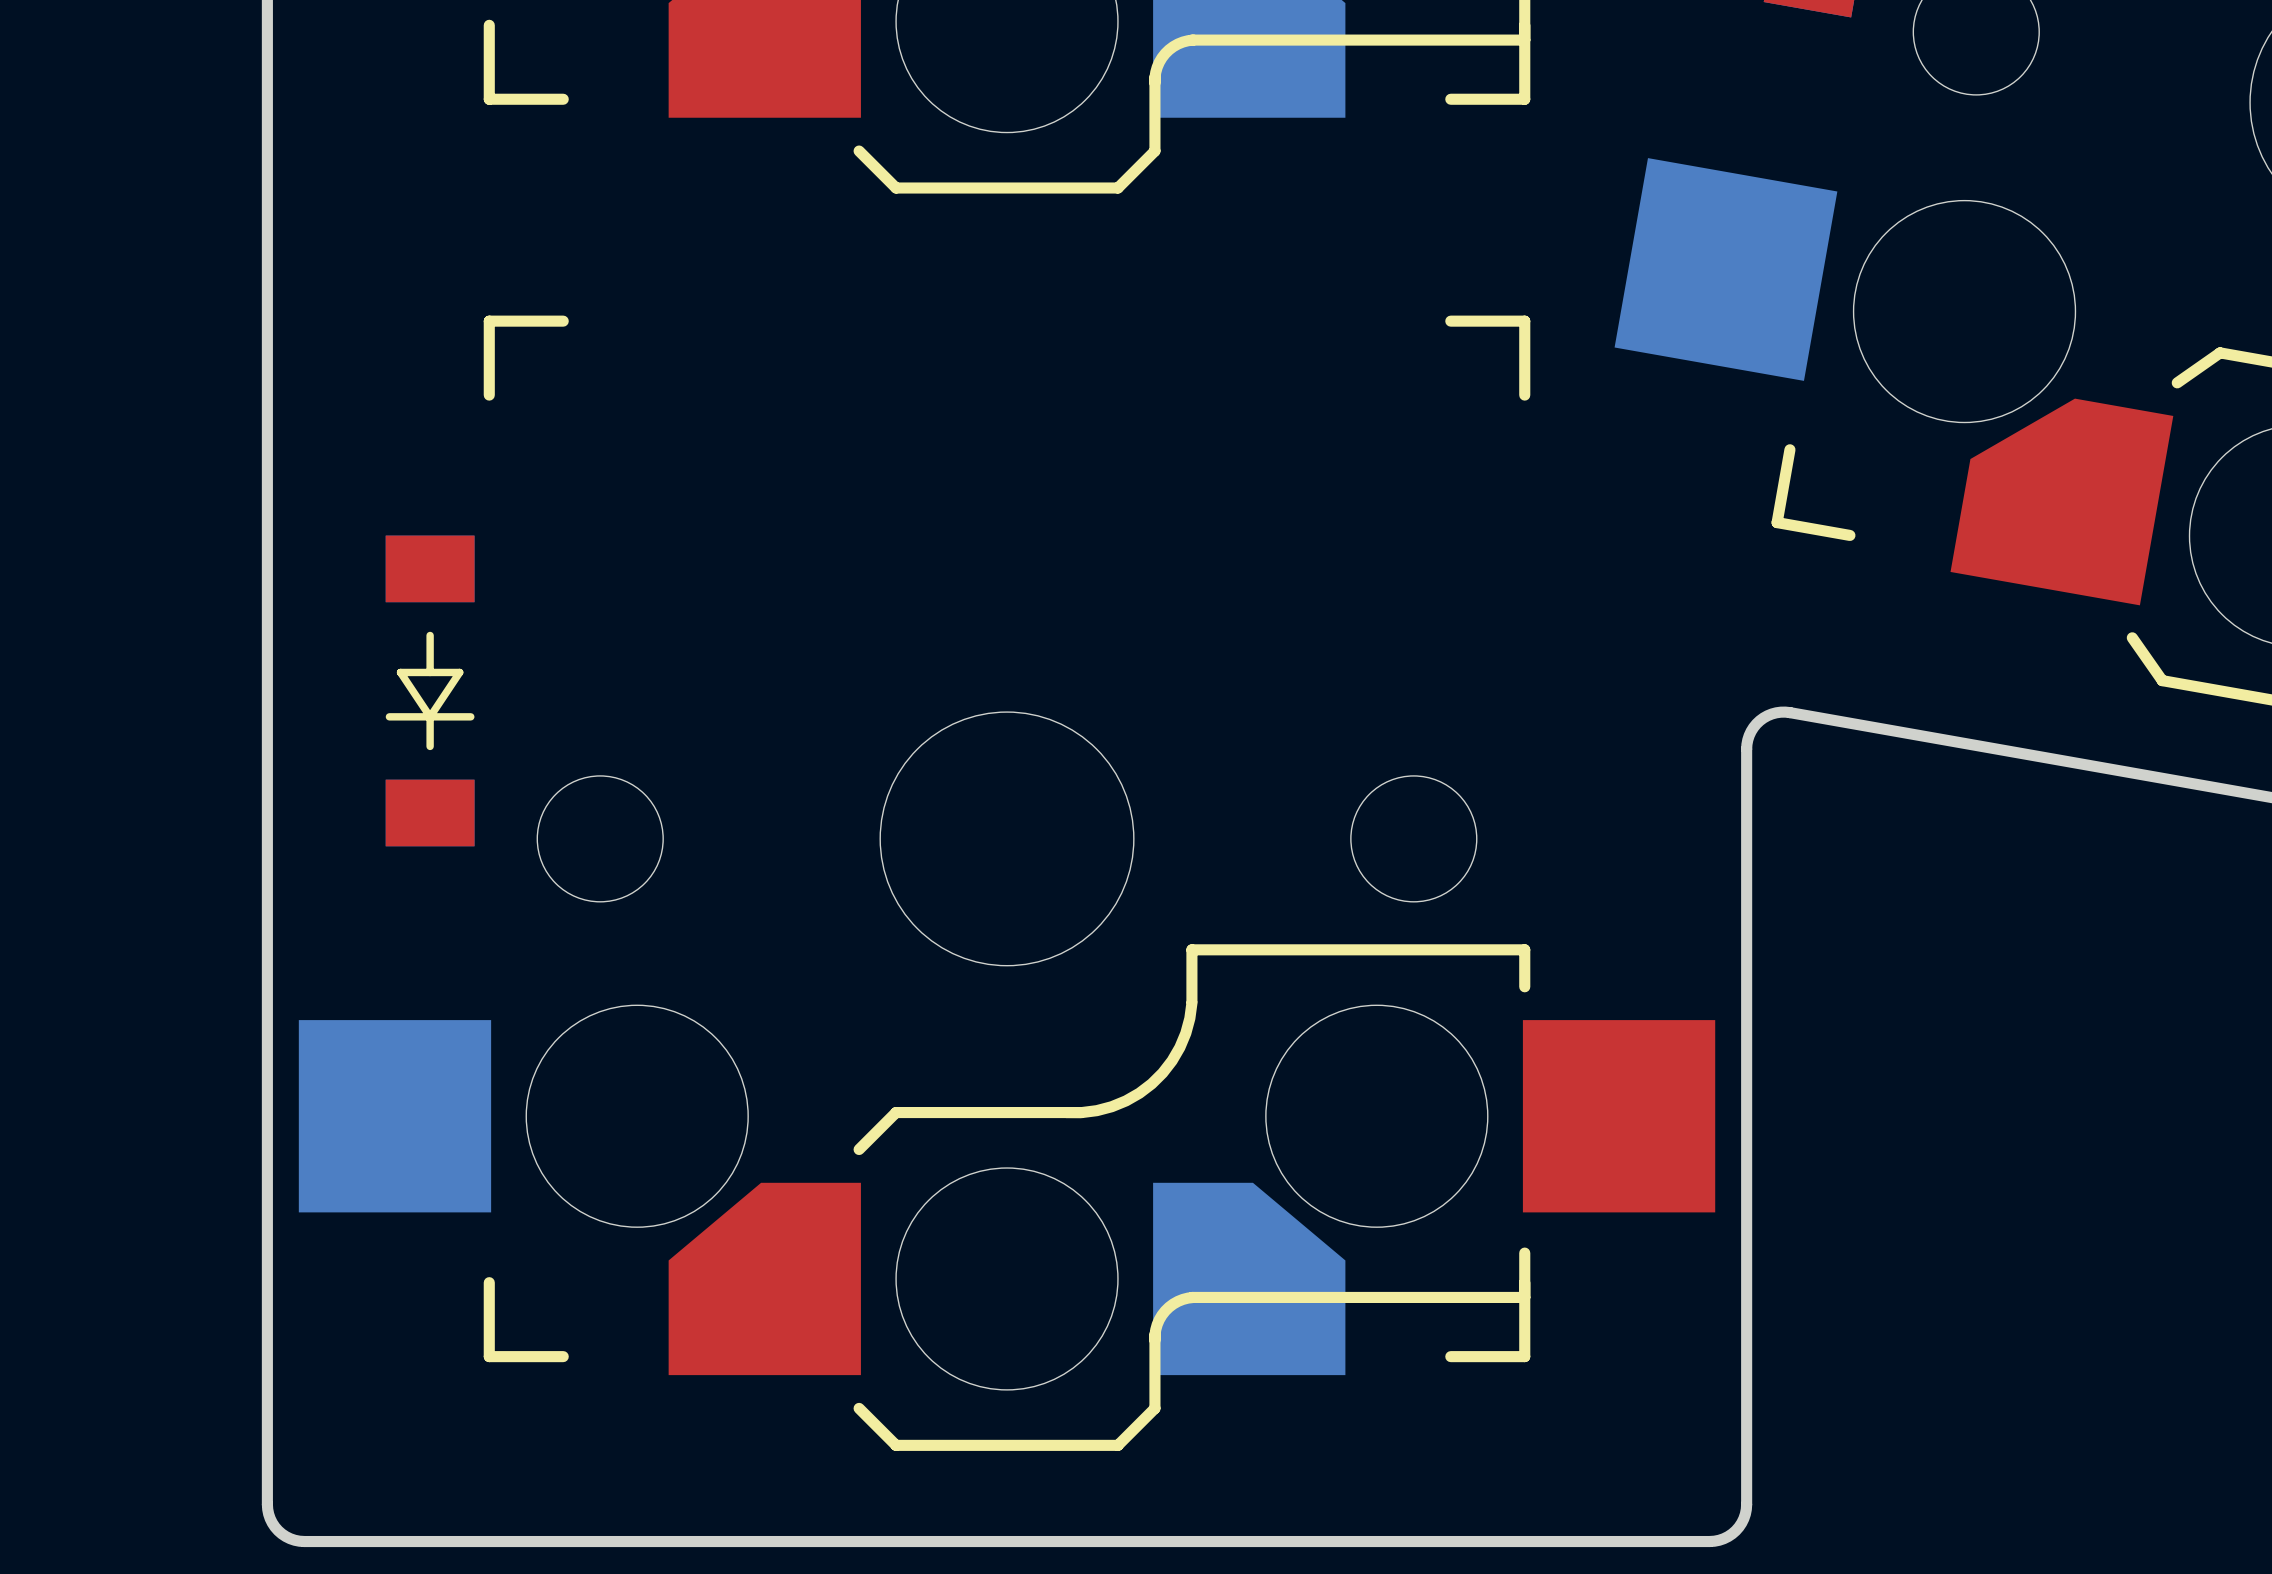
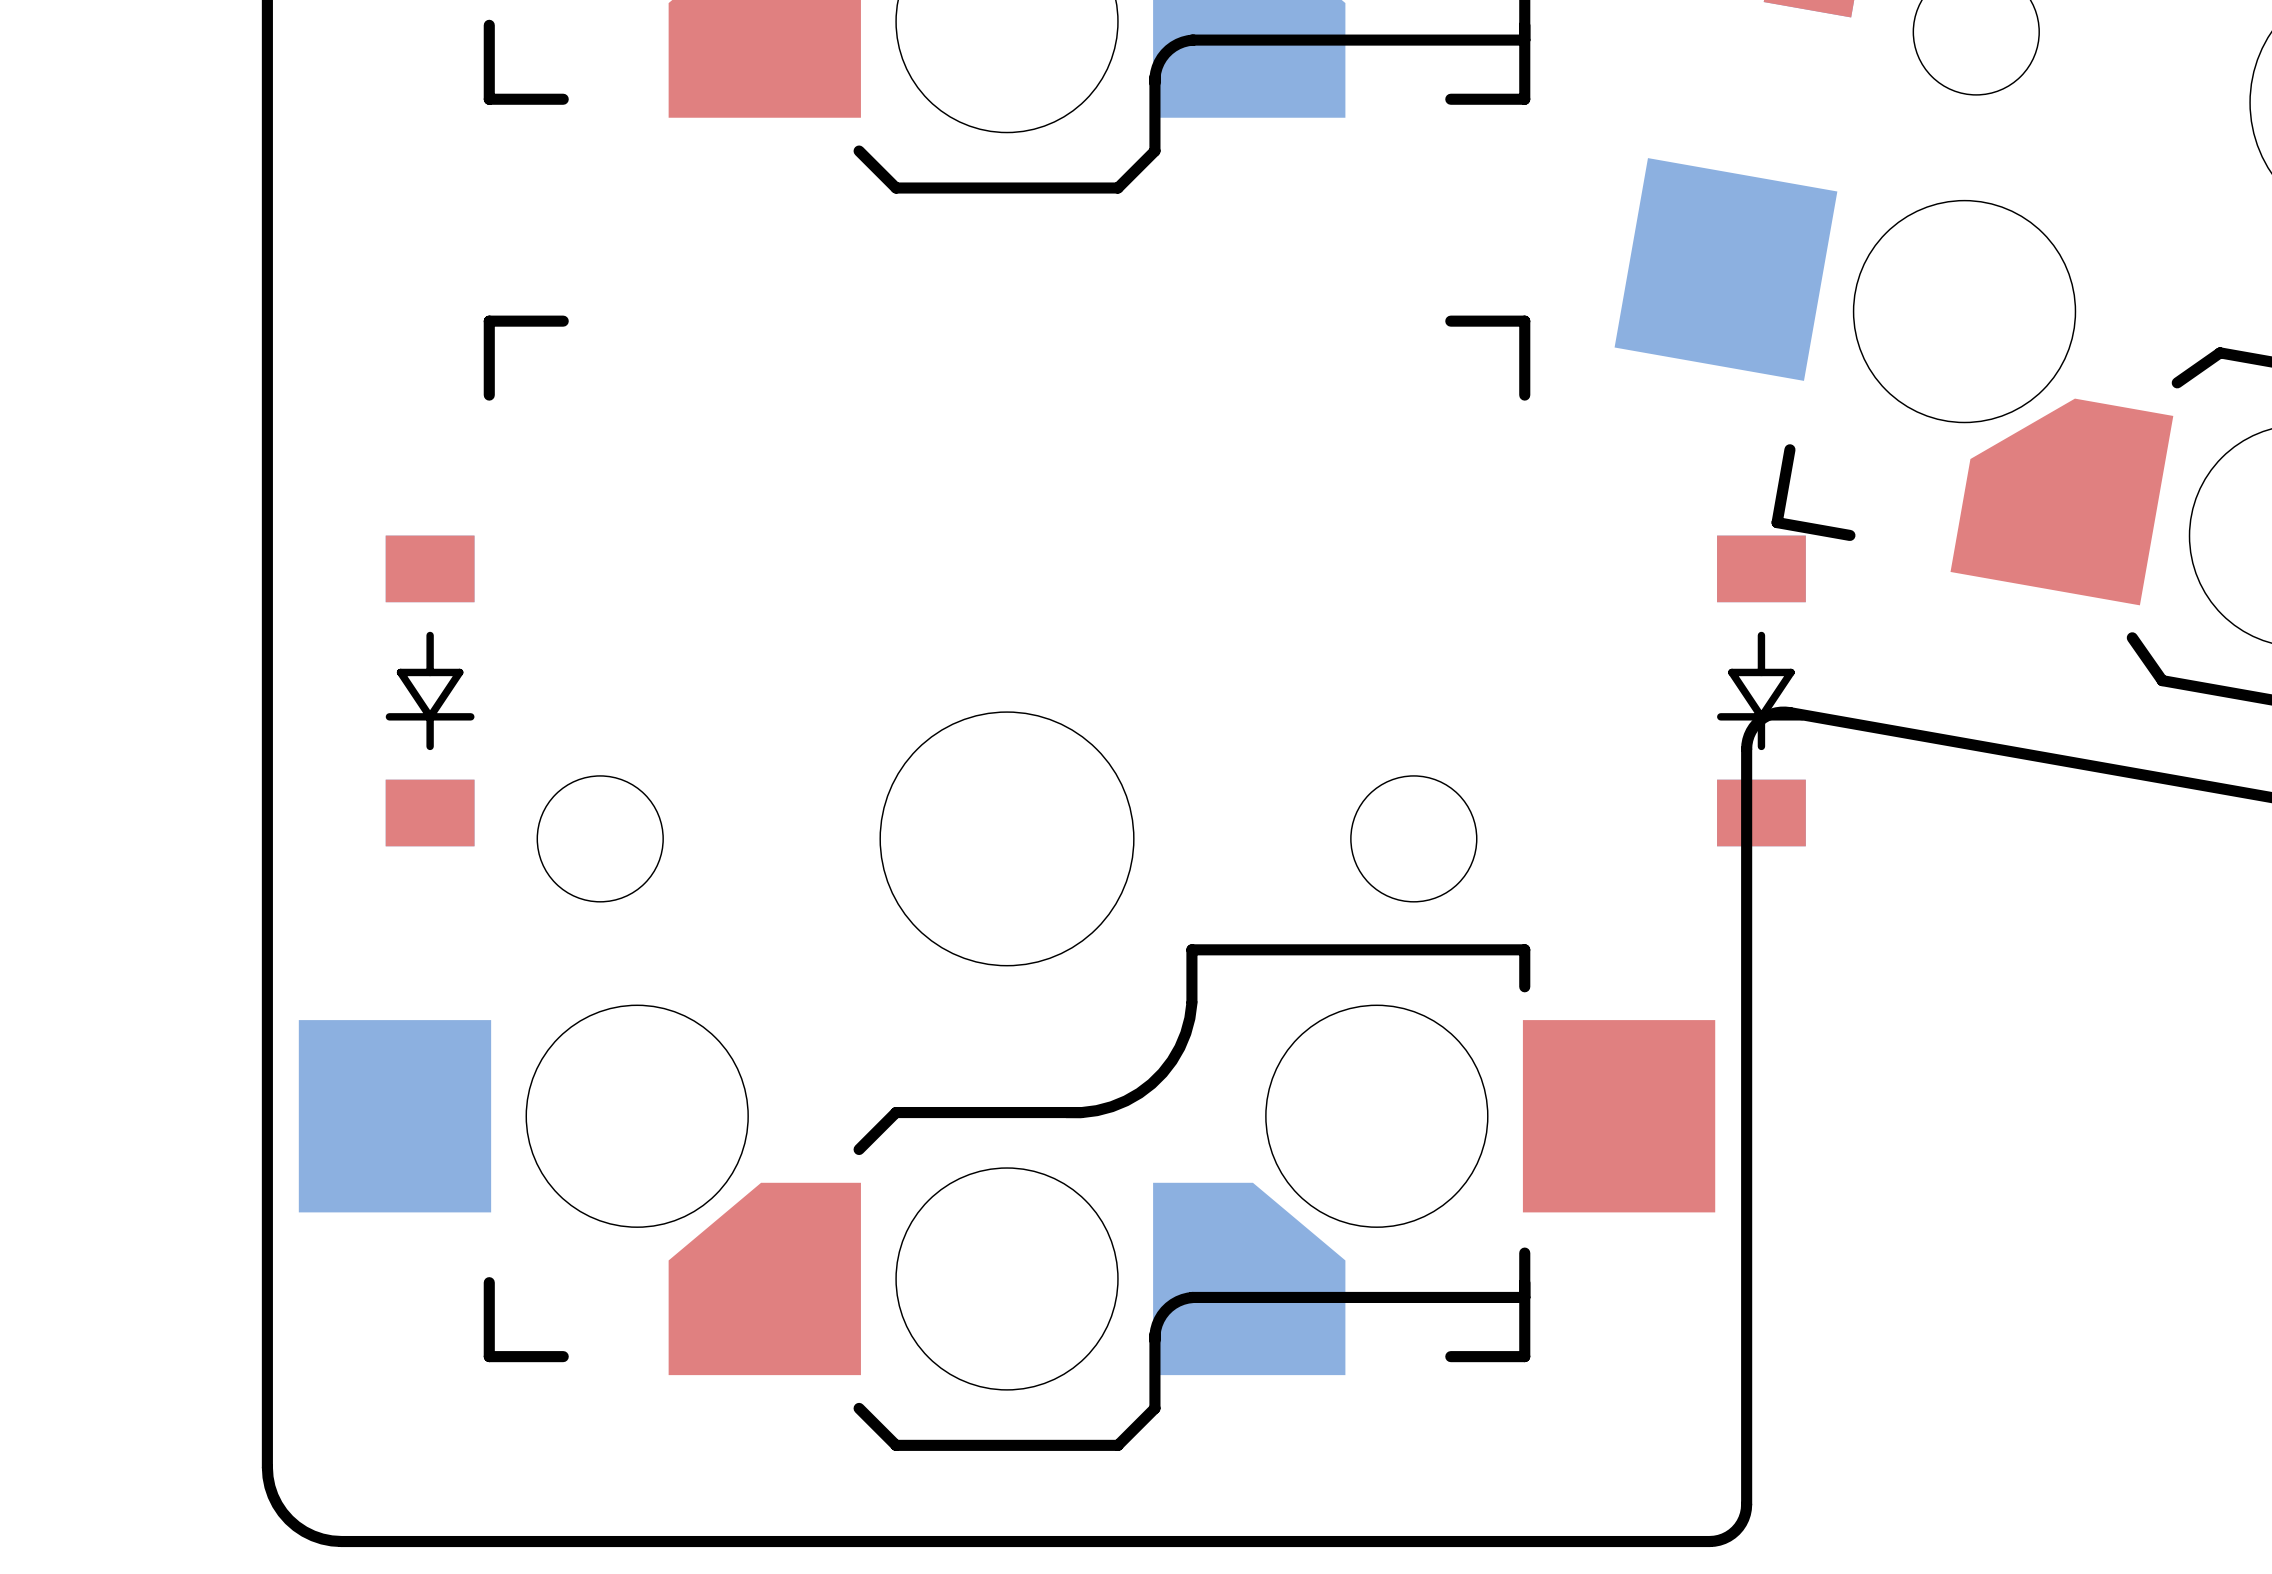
part: none -> (1761, 690)
board edge: (267, 1467) (267, 1509) (272, 1523) (278, 1530) (285, 1536) (299, 1541) (341, 1541) -> (267, 1467) (273, 1495) (289, 1519) (313, 1535) (341, 1541)

